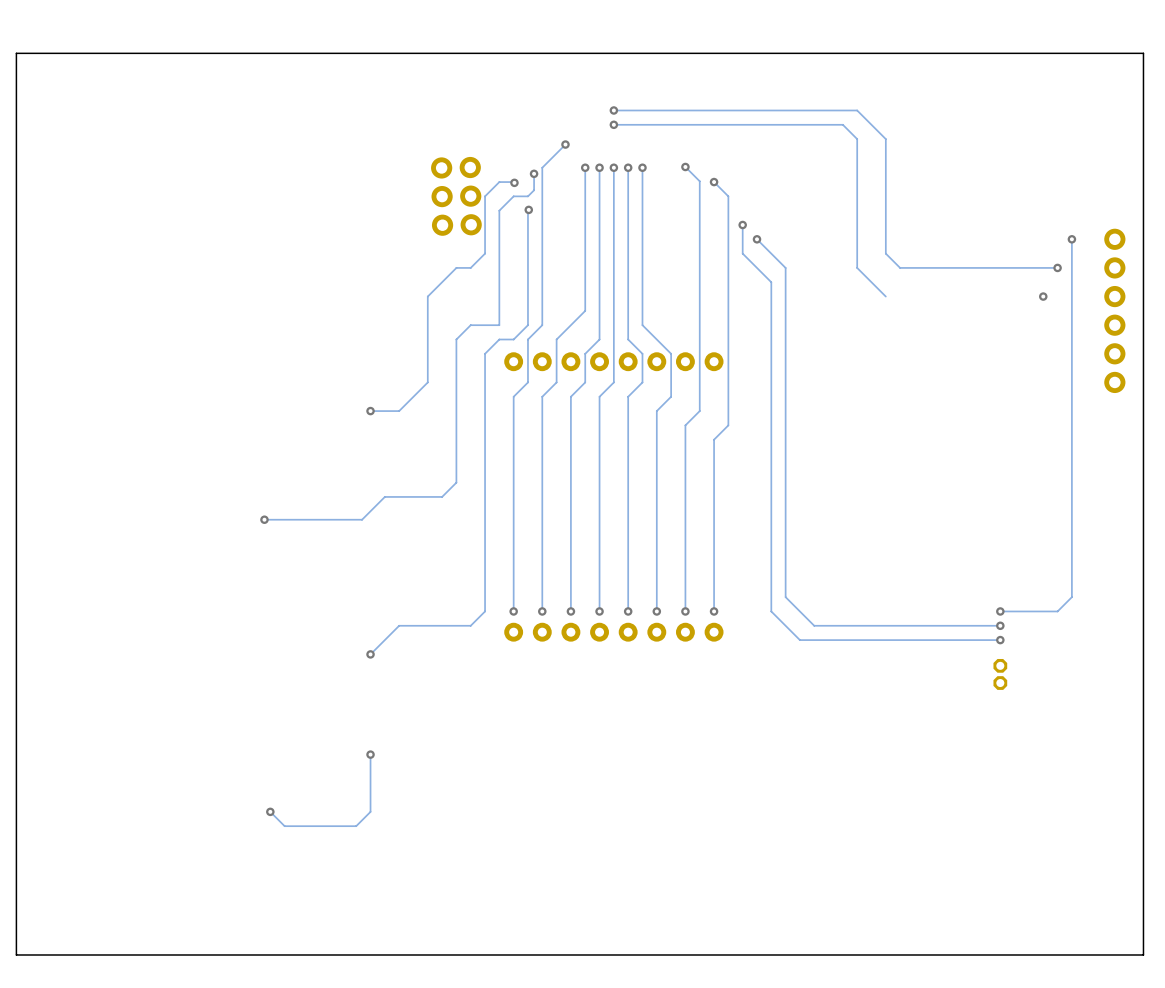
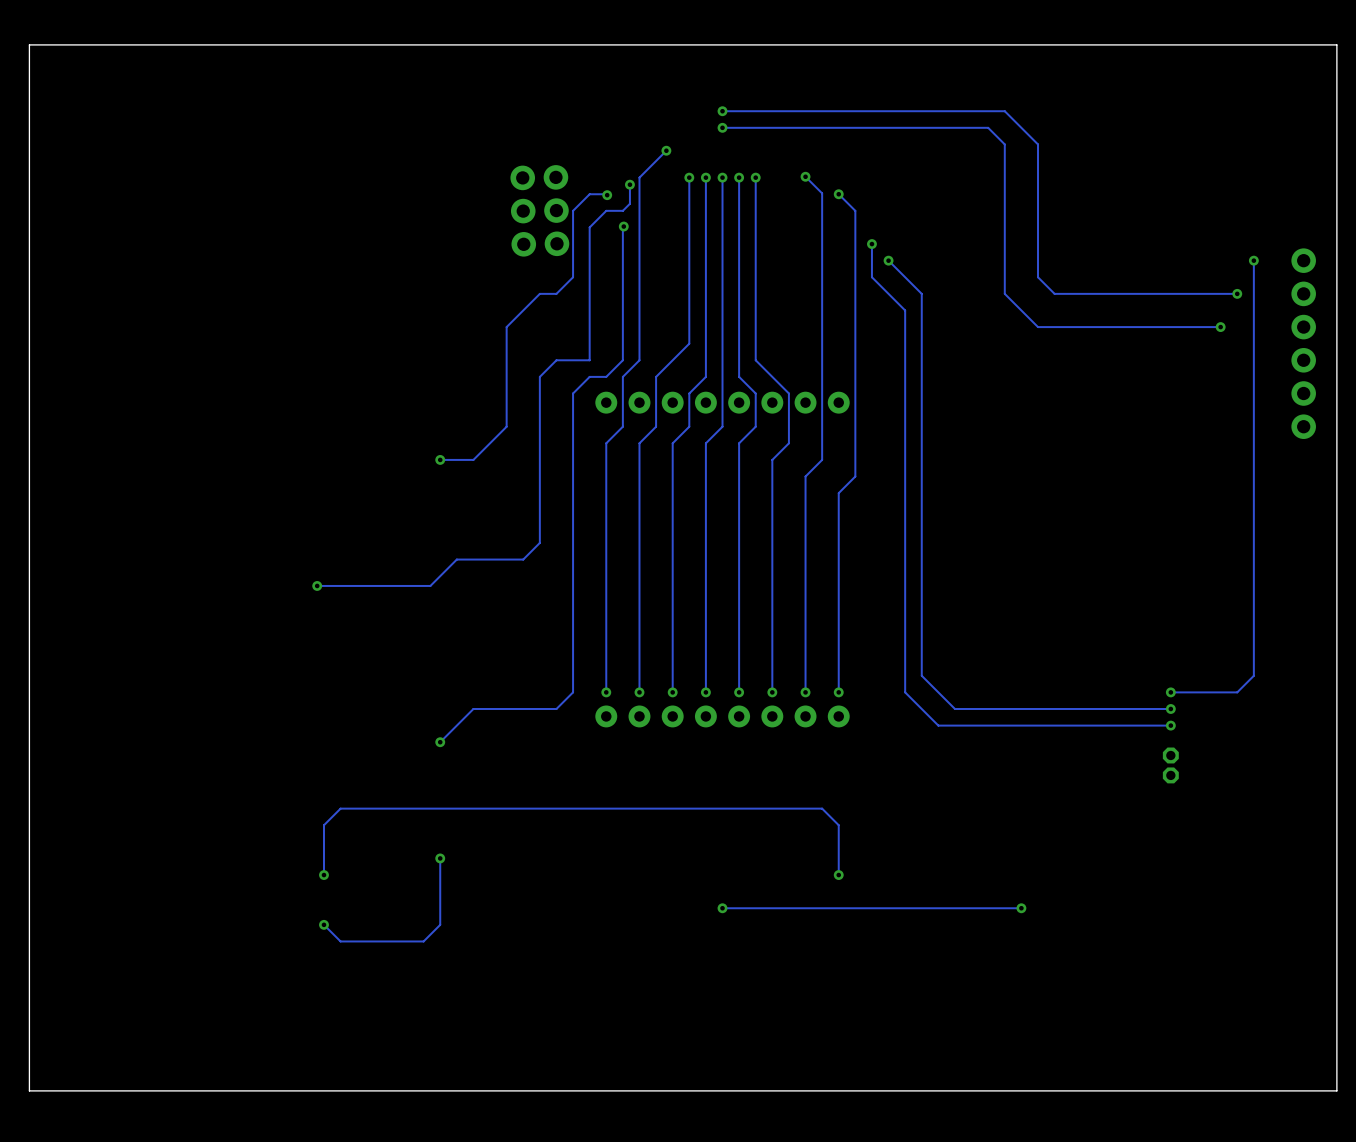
track: none -> (1220, 327) (1038, 327)
via: none -> (323, 875)
track: none -> (838, 875) (838, 825) (822, 808) (340, 808) (323, 825) (323, 875)
via: none -> (838, 875)
via: none -> (722, 908)
track: none -> (1021, 908) (722, 908)
via: none -> (1021, 908)

